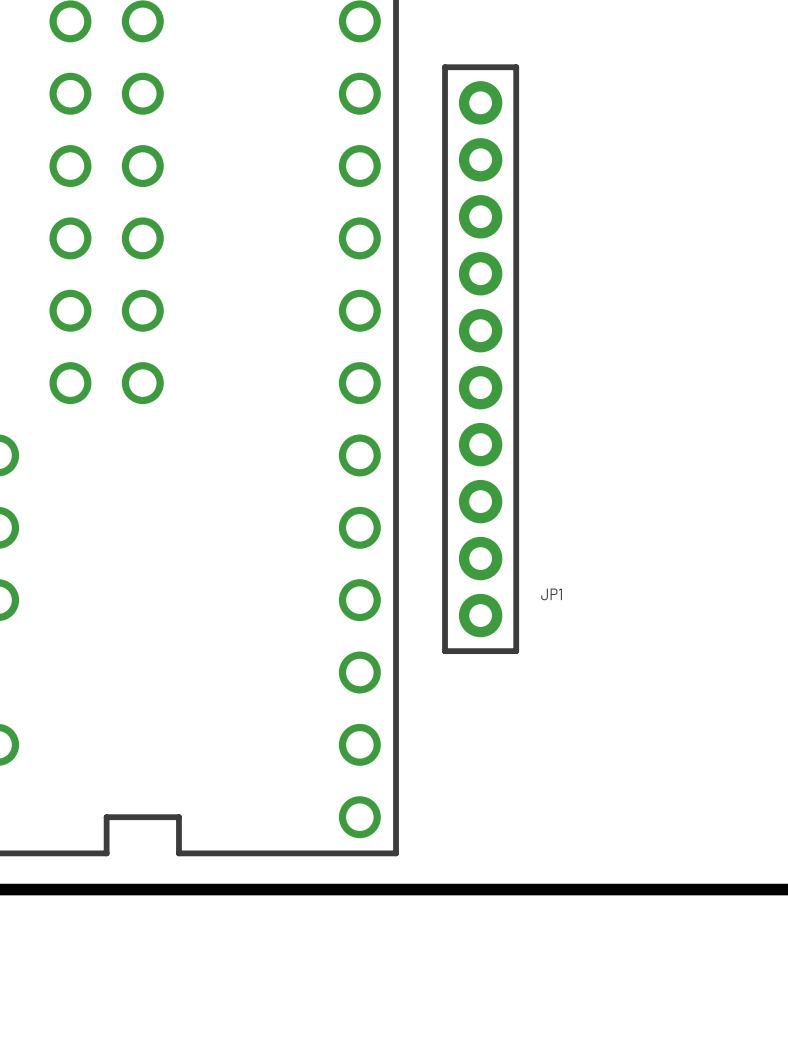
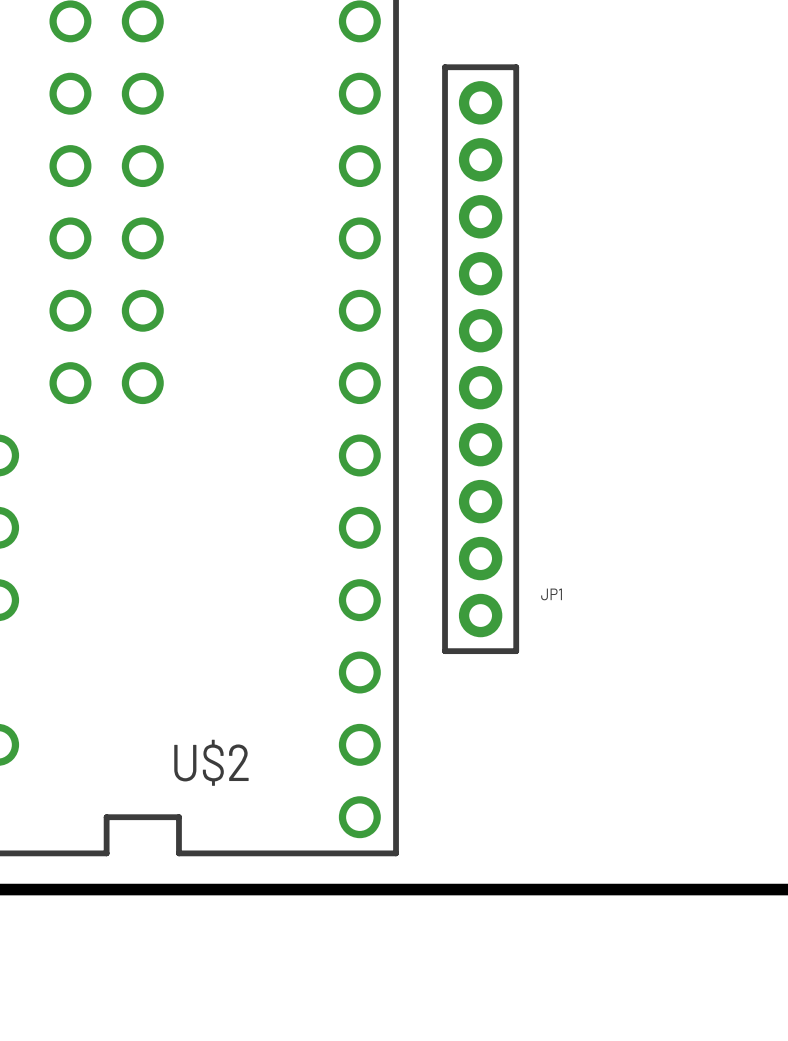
U$2 name: none -> U$2 (211, 762)

